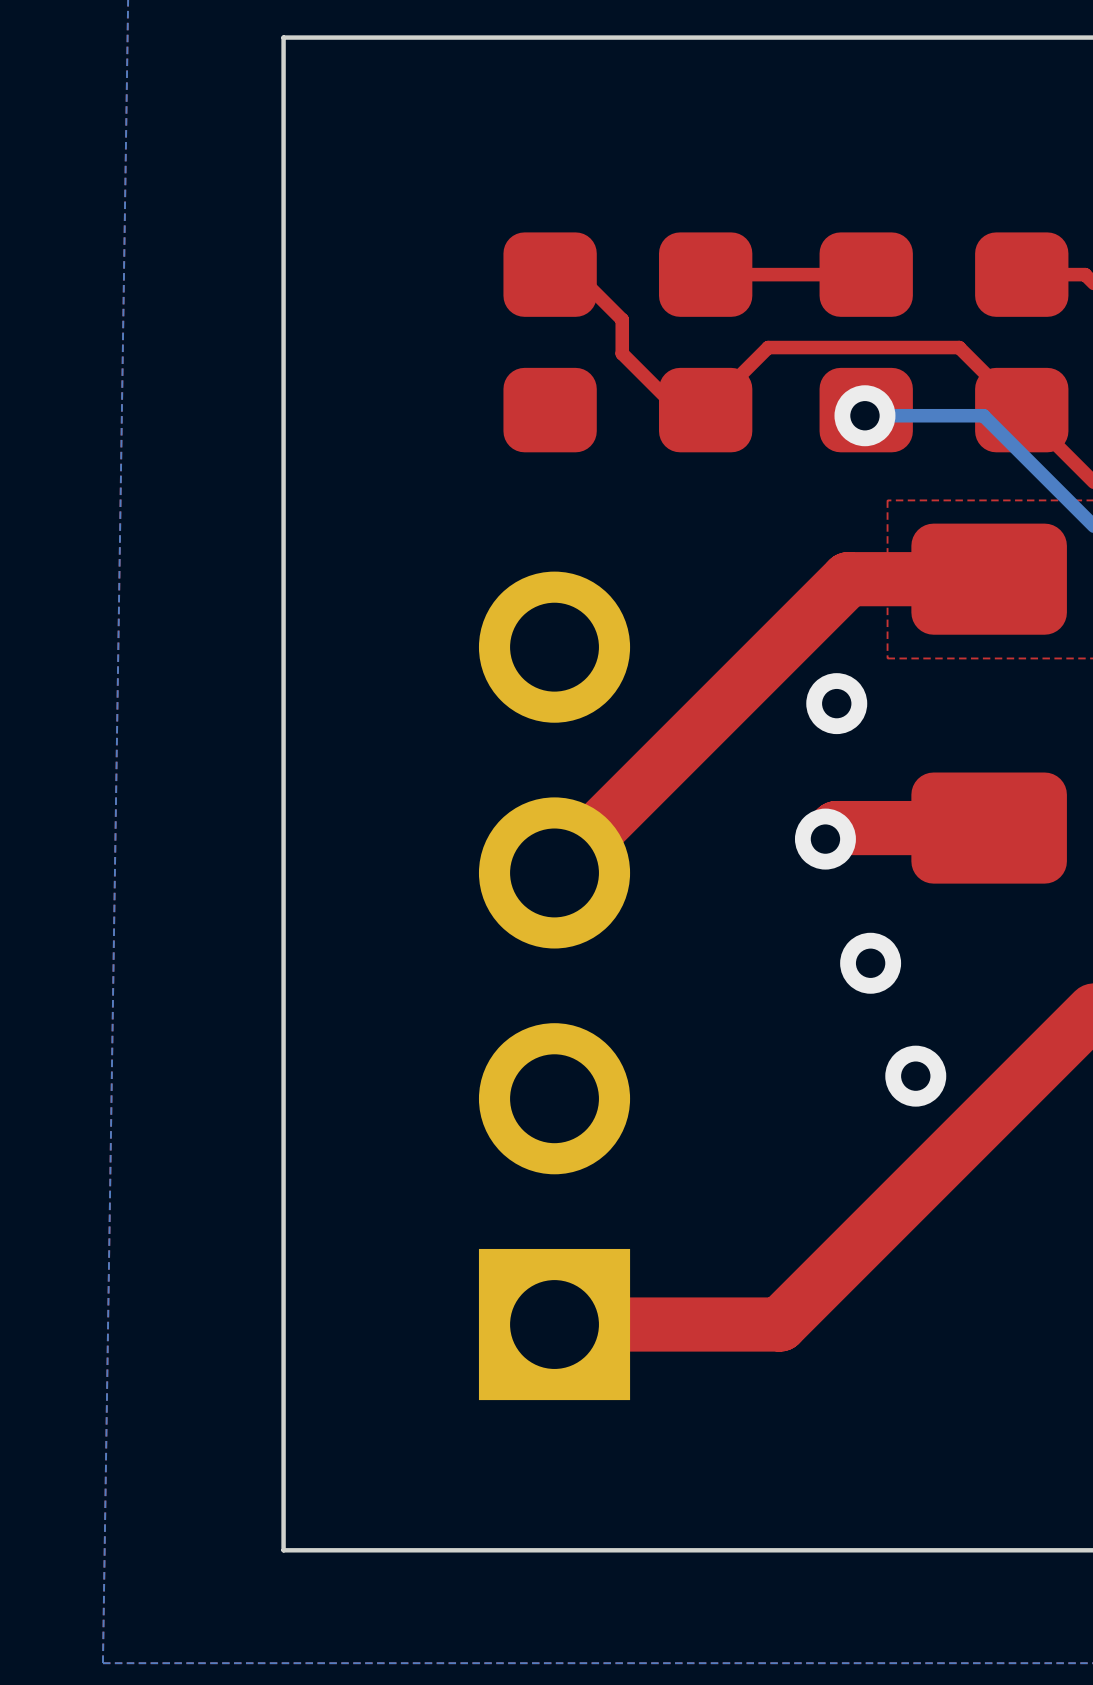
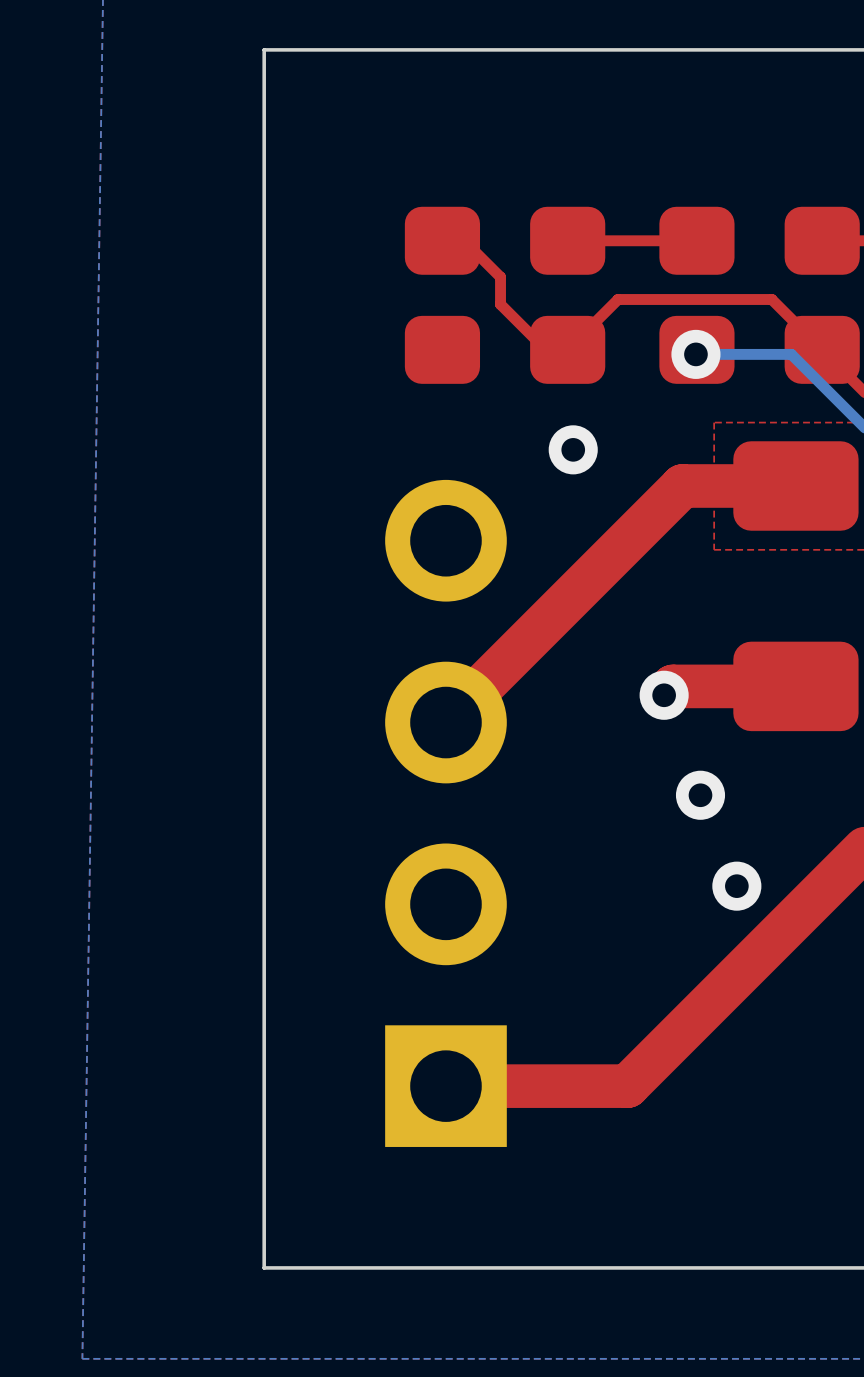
board edge: (328, 37) (283, 37) (283, 1550) (328, 1550) -> (264, 49) (264, 1267)
via position: (836, 703) -> (573, 449)

